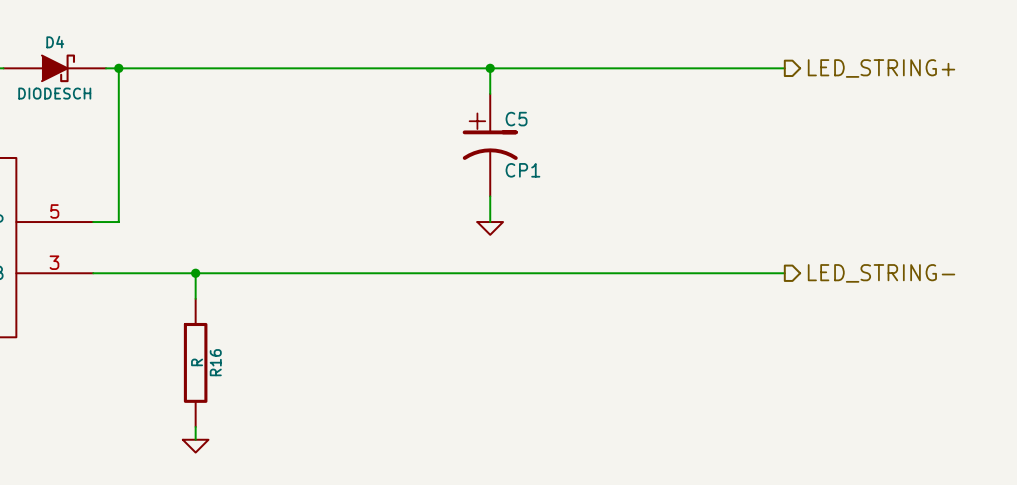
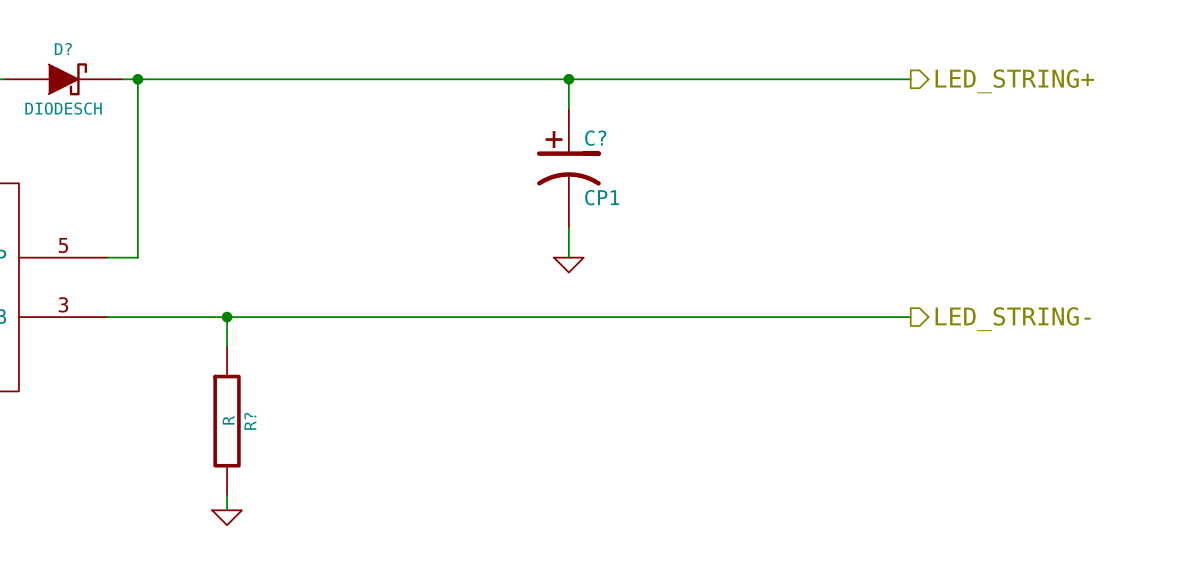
D4 name: D4 (55, 42) -> D? (63, 49)
C5 name: C5 (516, 119) -> C? (595, 138)
R16 name: R16 (215, 362) -> R? (250, 421)

